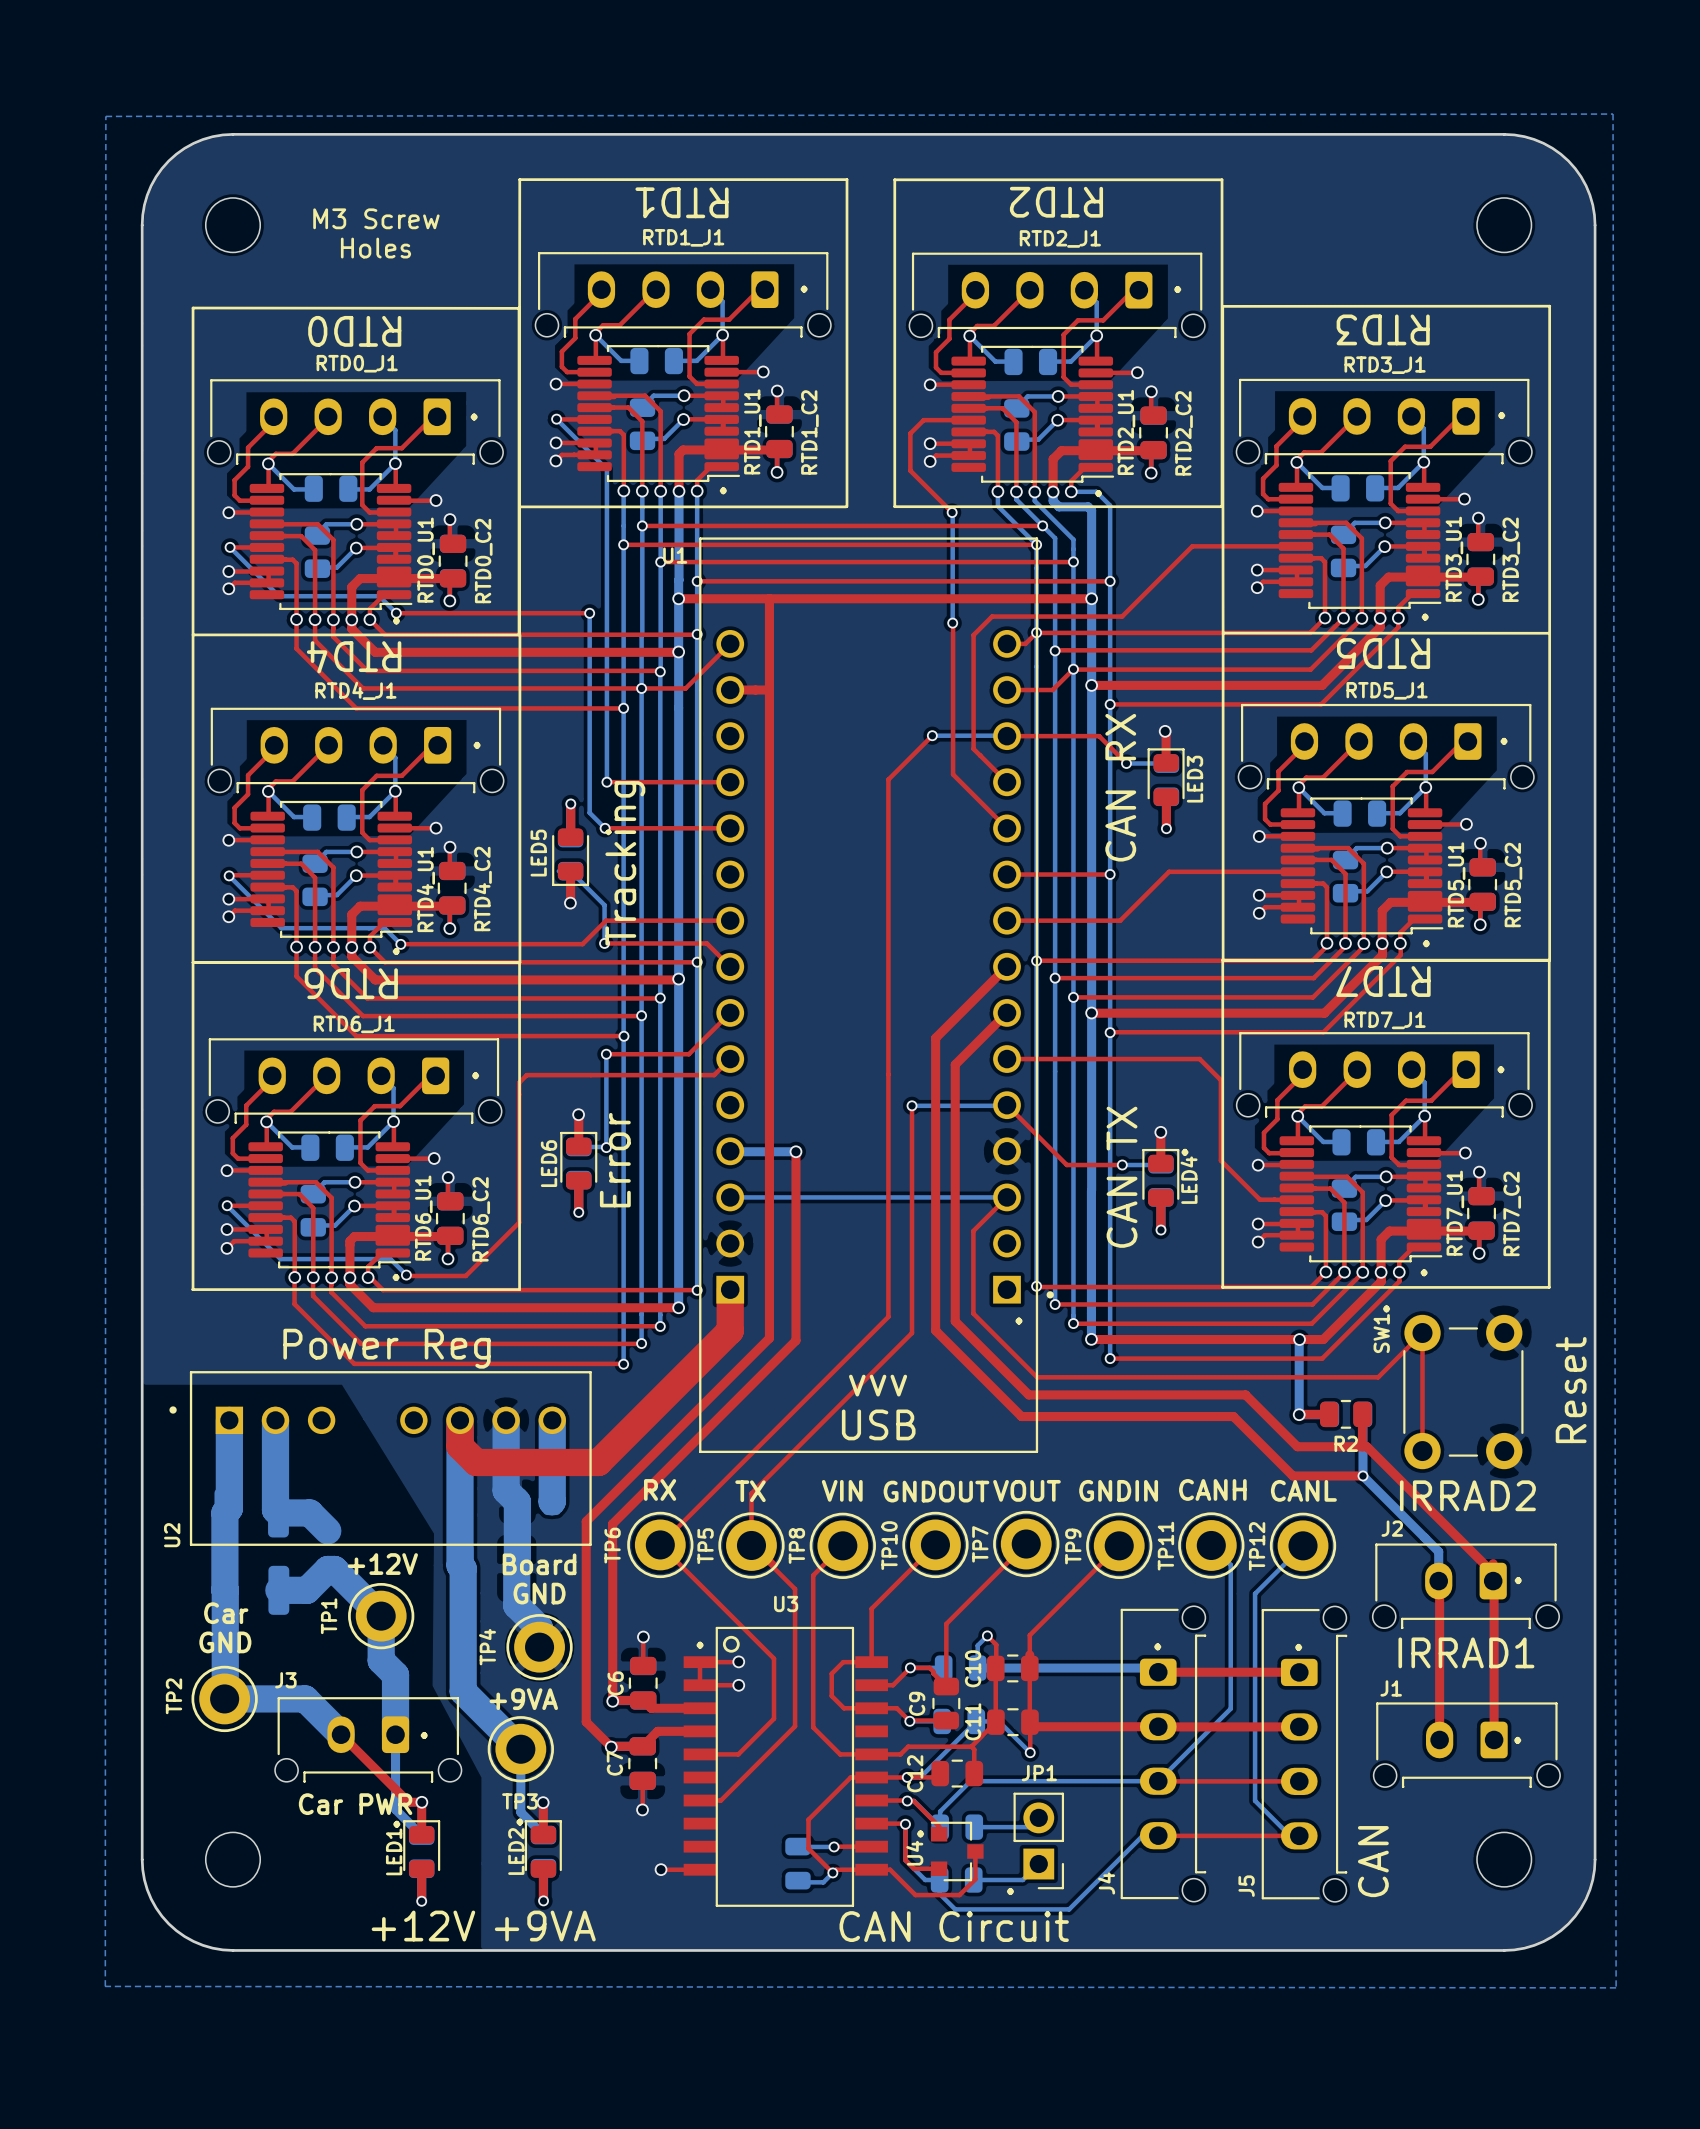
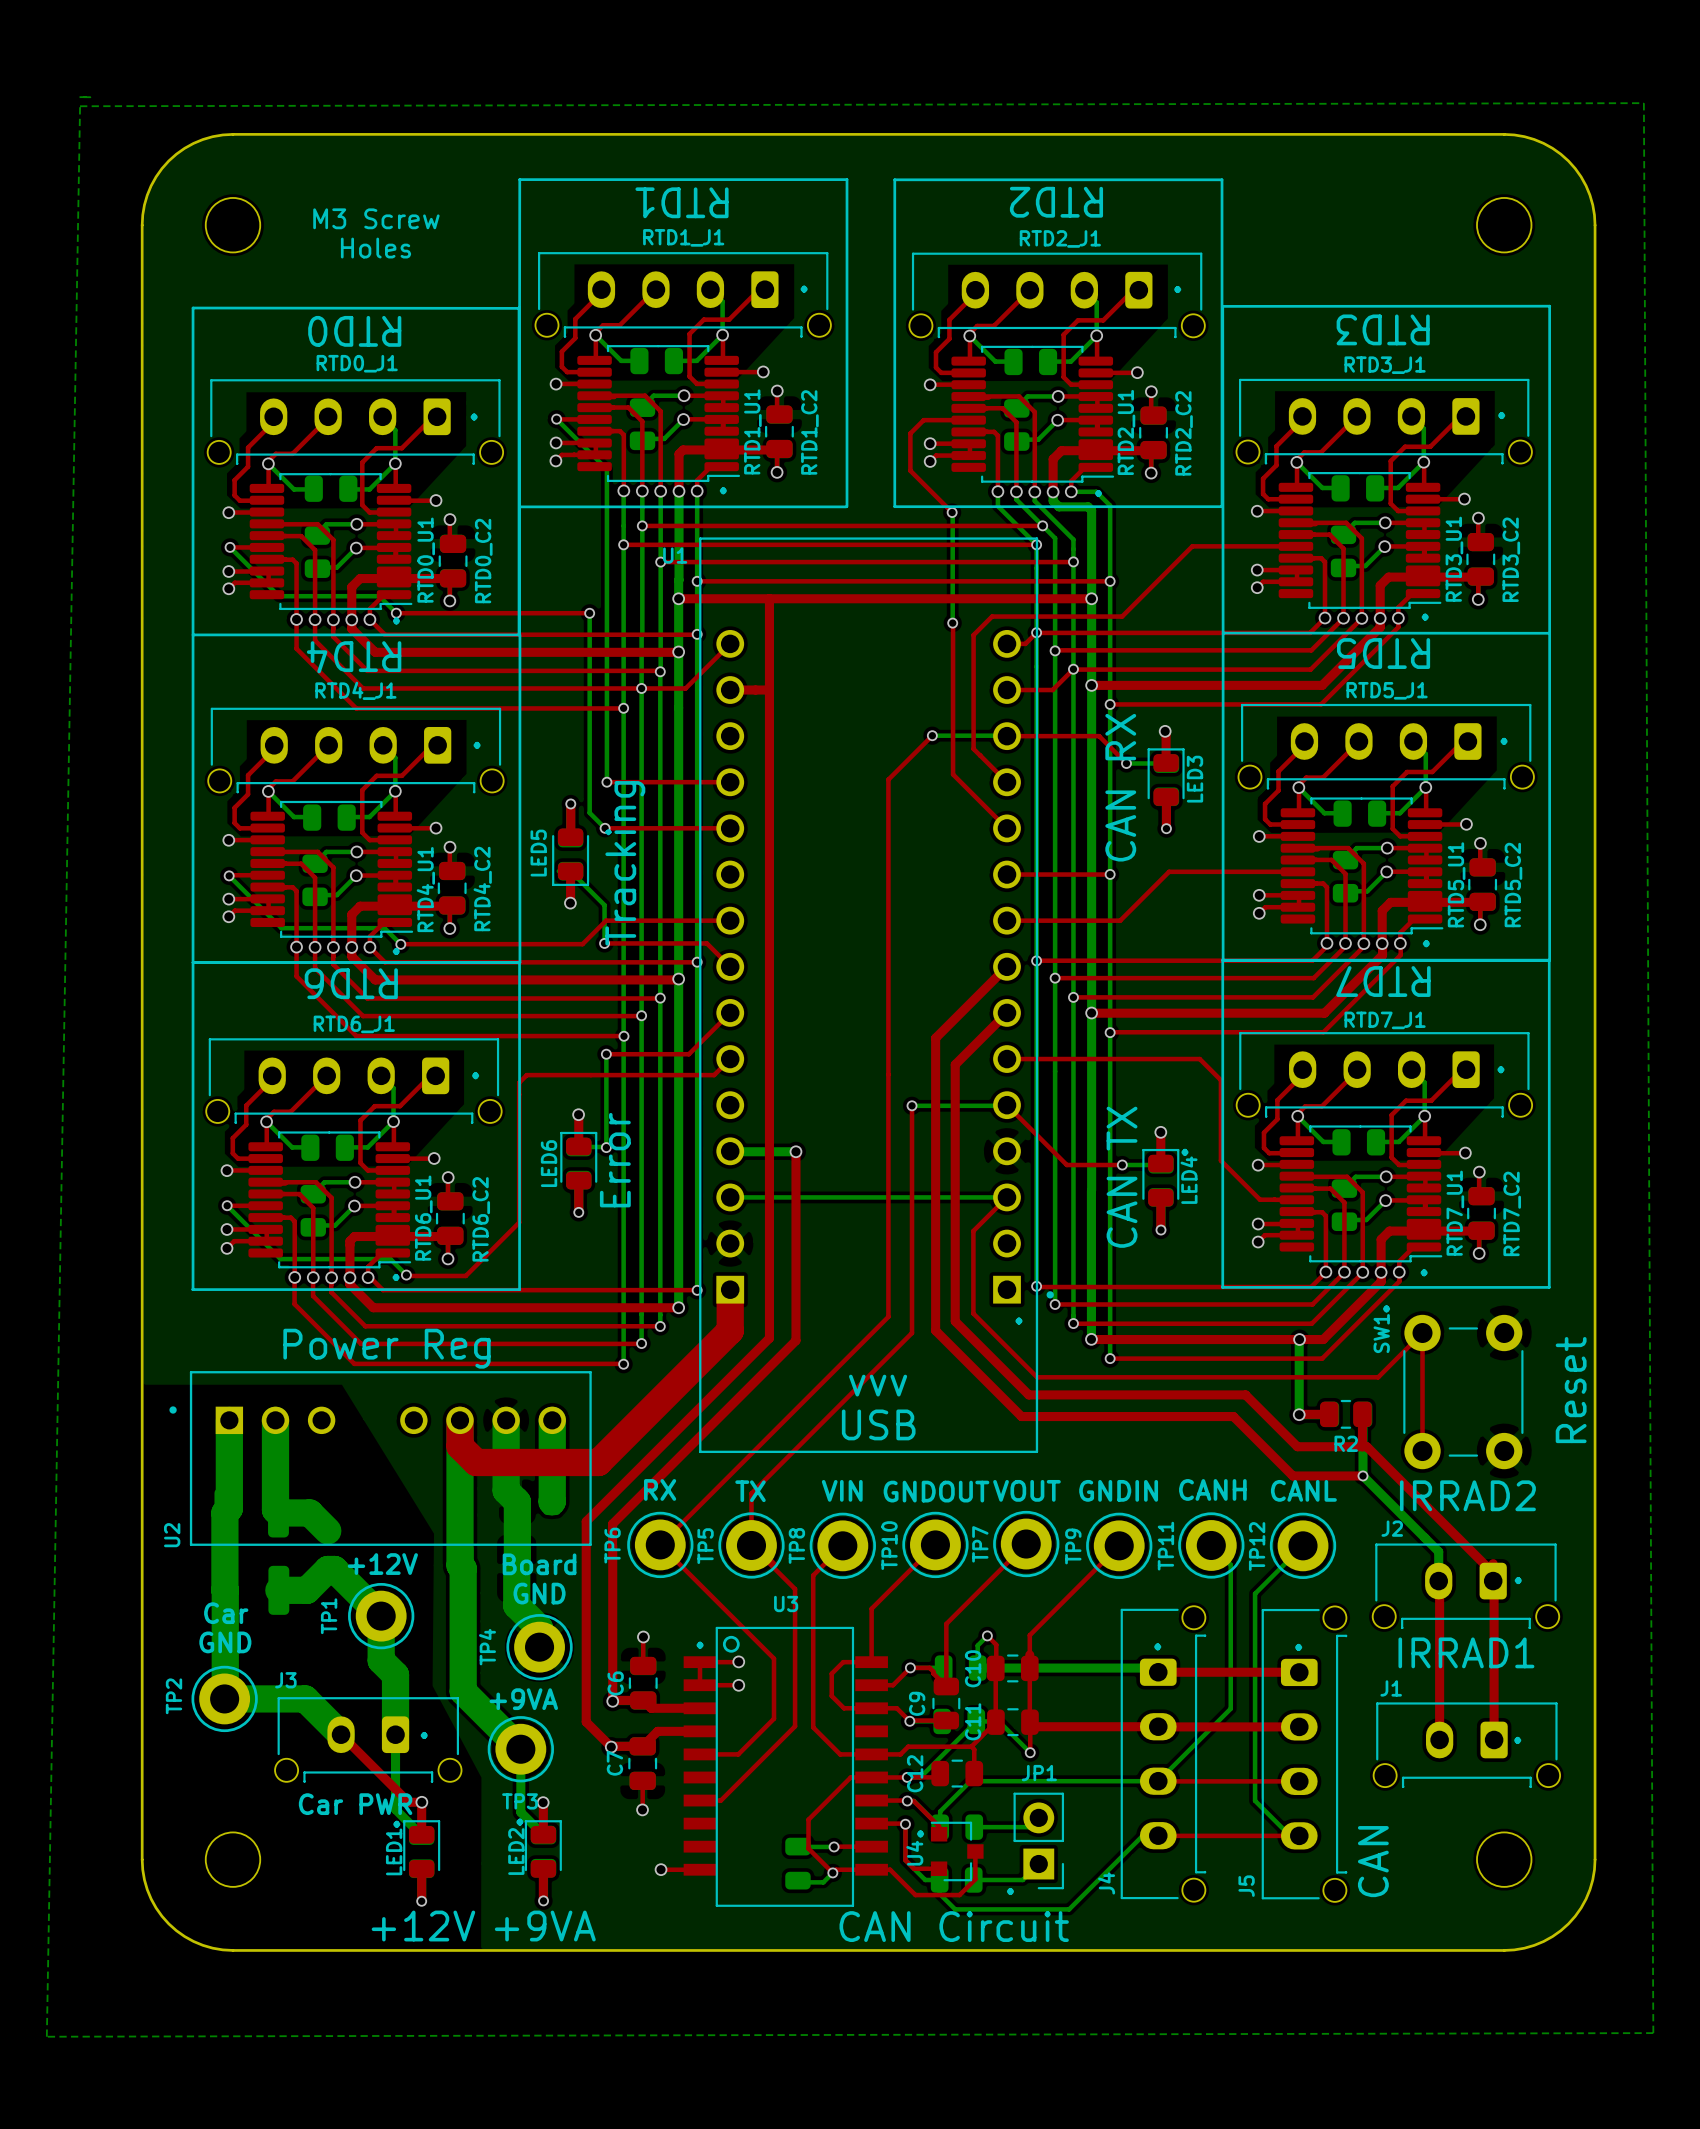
bottom zone outline: none -> (90, 96) (79, 97) (90, 97)
bottom zone outline: (1613, 114) (1616, 1987) (105, 1986) (105, 116) (1613, 114) -> (1643, 103) (80, 106) (46, 2036) (1653, 2033) (1643, 103)

